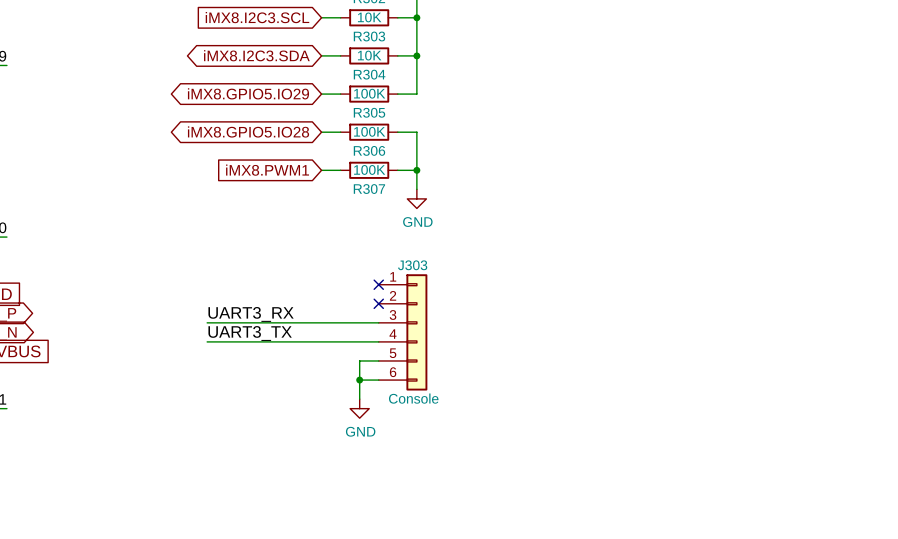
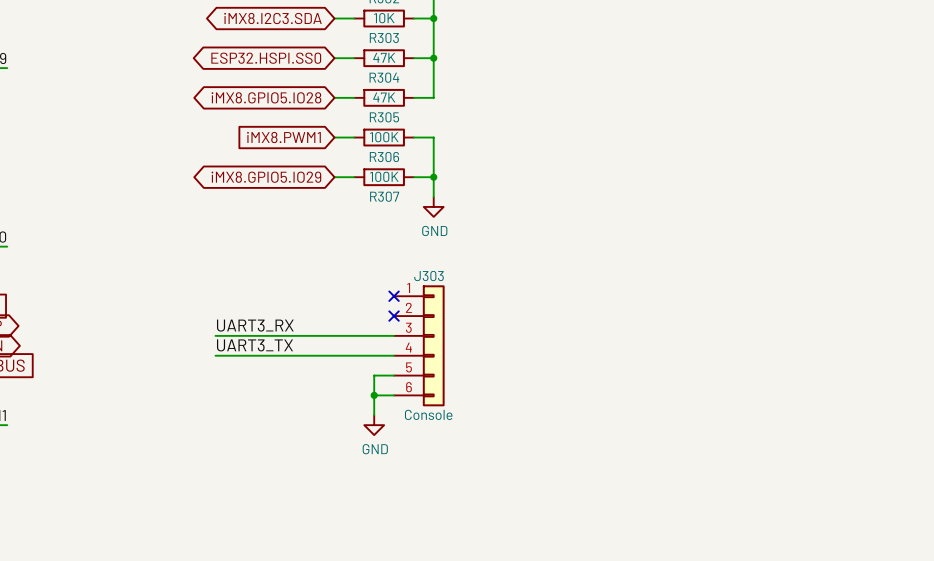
global label shape: input (257, 17) -> bidirectional (272, 18)
global label: iMX8.I2C3.SCL (257, 17) -> iMX8.I2C3.SDA (272, 18)
global label: iMX8.I2C3.SDA (256, 55) -> ESP32.HSPI.SS0 (266, 58)
R304 value: 10K (369, 55) -> 47K (384, 57)
global label: iMX8.GPIO5.IO29 (248, 93) -> iMX8.GPIO5.IO28 (266, 97)
R305 value: 100K (369, 93) -> 47K (384, 97)
global label shape: bidirectional (248, 131) -> input (283, 137)
global label: iMX8.GPIO5.IO28 (248, 131) -> iMX8.PWM1 (283, 137)
global label shape: input (267, 170) -> bidirectional (266, 177)
global label: iMX8.PWM1 (267, 170) -> iMX8.GPIO5.IO29 (266, 177)

